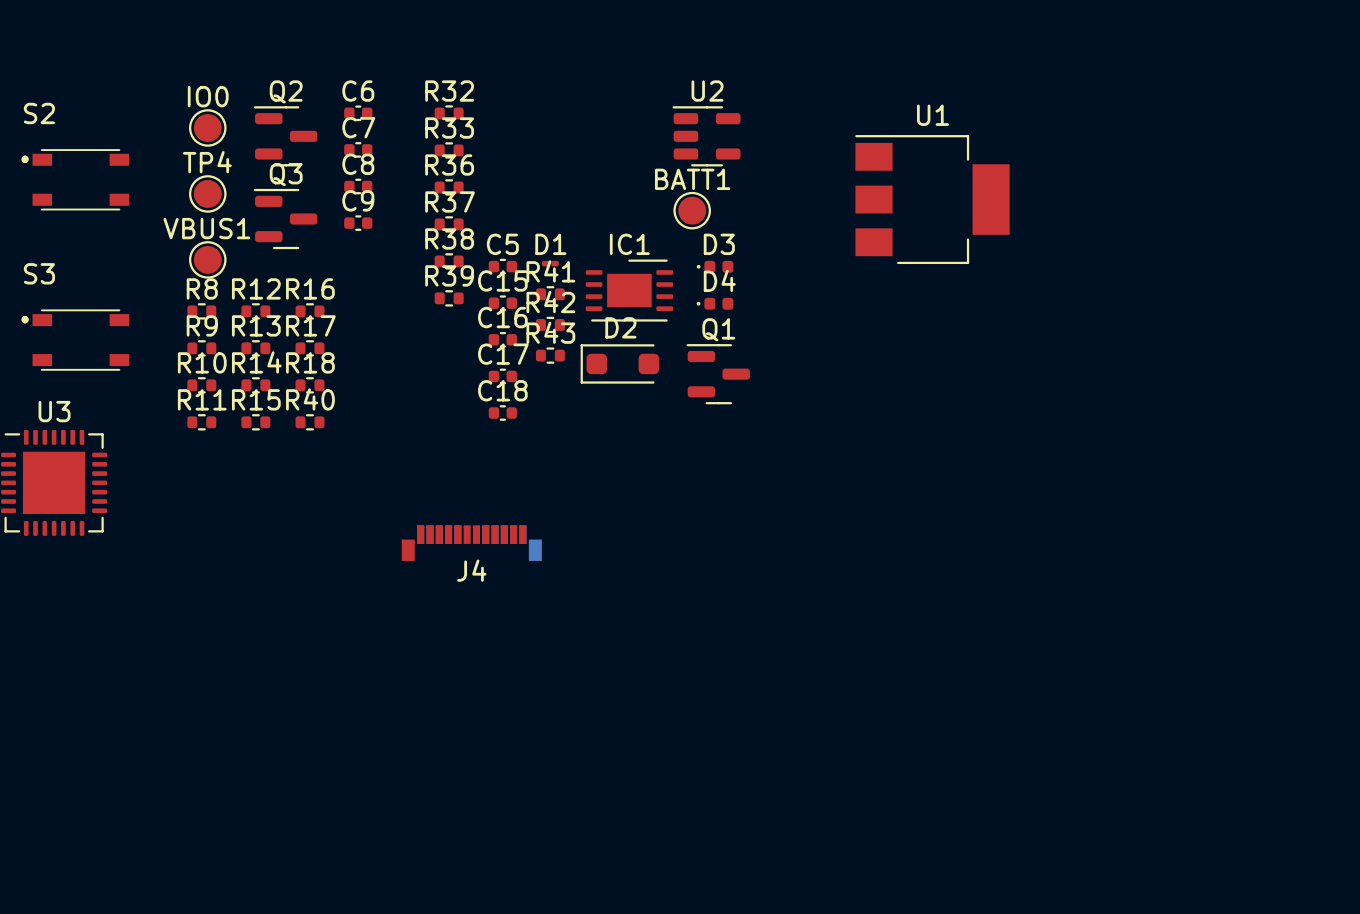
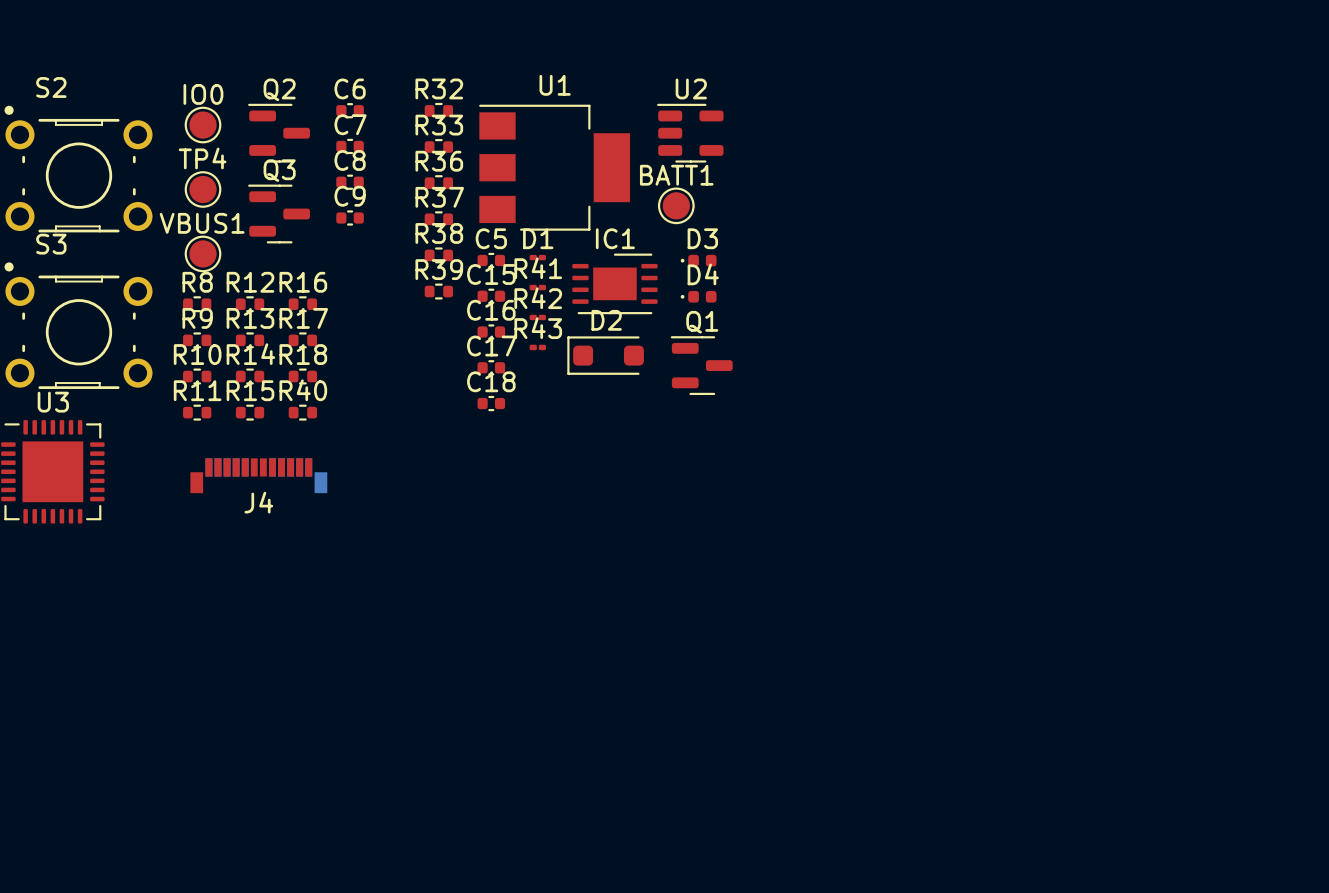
S2 footprint: [21, 149, 130, 211] -> [4, 105, 153, 233]
U1 position: (932, 199) -> (554, 167)
R41 footprint: [535, 286, 565, 303] -> [529, 284, 546, 291]
S3 footprint: [21, 309, 130, 371] -> [4, 262, 153, 390]
R42 footprint: [535, 316, 565, 334] -> [529, 314, 546, 321]
R43 footprint: [535, 347, 565, 364] -> [529, 344, 546, 351]
J4 position: (471, 543) -> (258, 475)

